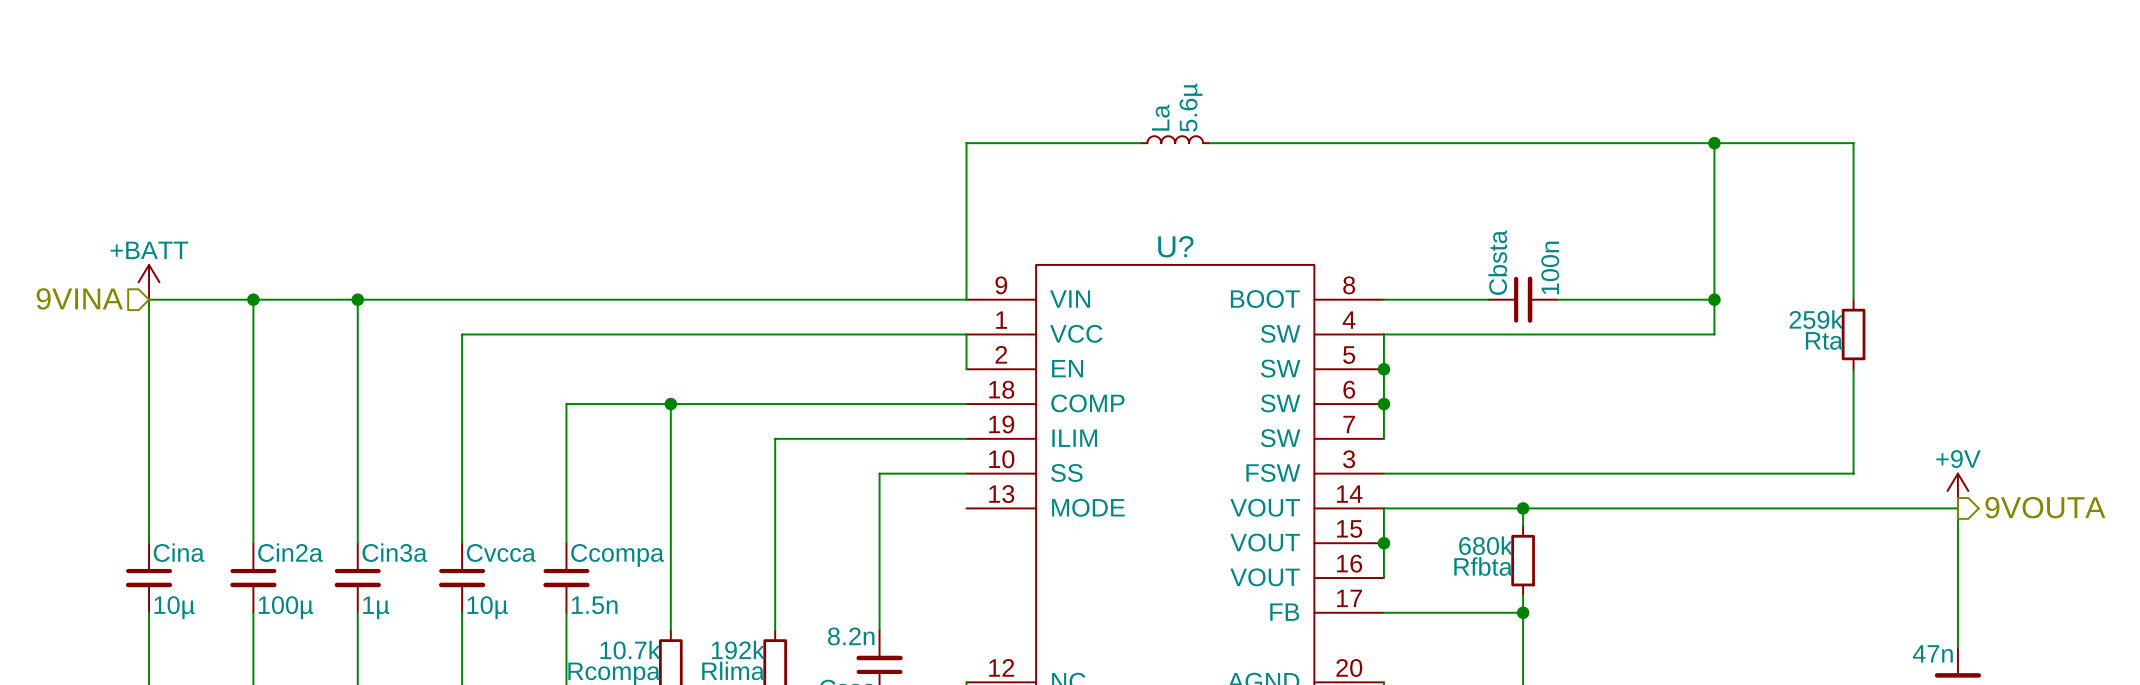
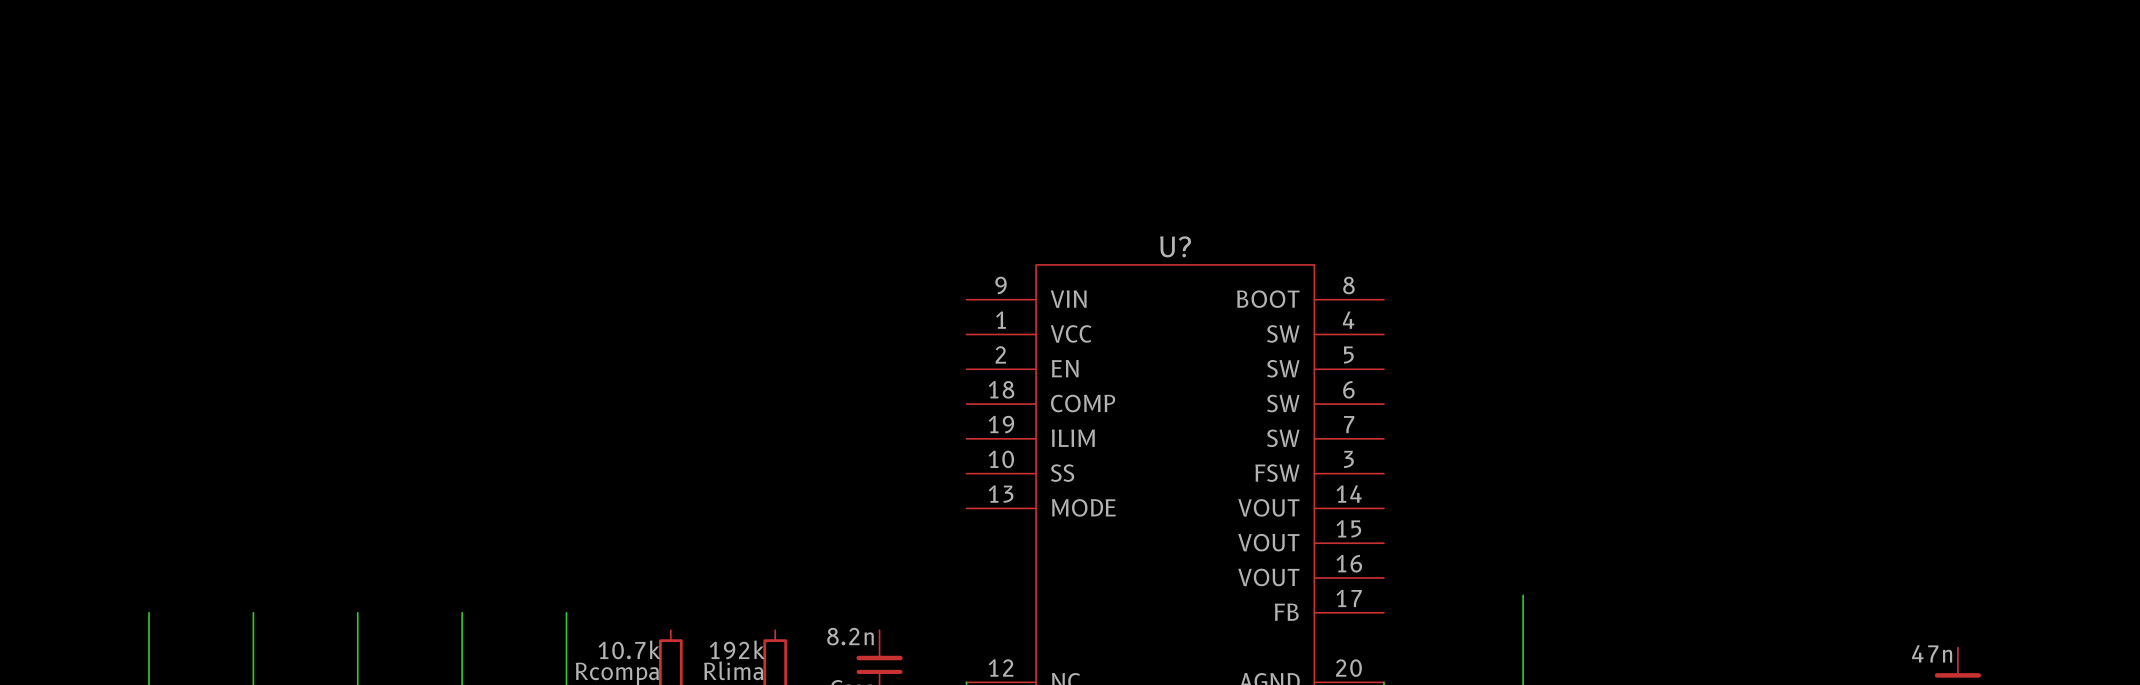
La: 5.6µ (1175, 139) -> none
wire: (1140, 143) (966, 143) (966, 299) (149, 299) (149, 543) -> none
wire: (1210, 143) (1853, 143) (1853, 299) -> none
wire: (1714, 143) (1714, 334) (1383, 334) (1383, 438) -> none
junction: (1714, 143) -> none
power symbol: +BATT (149, 282) -> none
hierarchical label: 9VINA (79, 298) -> none
wire: (253, 299) (253, 543) -> none
junction: (253, 299) -> none
wire: (357, 299) (357, 543) -> none
junction: (357, 299) -> none
wire: (1383, 299) (1488, 299) -> none
Cbsta: 100n (1523, 299) -> none
wire: (1557, 299) (1714, 299) -> none
junction: (1714, 299) -> none
Rta: 259k (1853, 334) -> none
wire: (966, 369) (966, 334) (462, 334) (462, 543) -> none
junction: (1383, 369) -> none
wire: (1853, 369) (1853, 473) (1383, 473) -> none
wire: (670, 404) (670, 630) -> none
junction: (670, 404) -> none
wire: (966, 404) (566, 404) (566, 543) -> none
junction: (1383, 404) -> none
wire: (966, 438) (775, 438) (775, 630) -> none
wire: (966, 473) (879, 473) (879, 630) -> none
power symbol: +9V (1957, 491) -> none
hierarchical label: 9VOUTA (2045, 507) -> none
wire: (1523, 508) (1523, 525) -> none
junction: (1523, 508) -> none
junction: (1383, 543) -> none
Rfbta: 680k (1523, 560) -> none
Cina: 10µ (149, 577) -> none
Cin2a: 100µ (253, 577) -> none
Cin3a: 1µ (357, 577) -> none
Cvcca: 10µ (462, 577) -> none
Ccompa: 1.5n (566, 577) -> none
wire: (1383, 577) (1383, 508) (1957, 508) (1957, 647) -> none
wire: (1383, 612) (1523, 612) -> none
junction: (1523, 612) -> none

